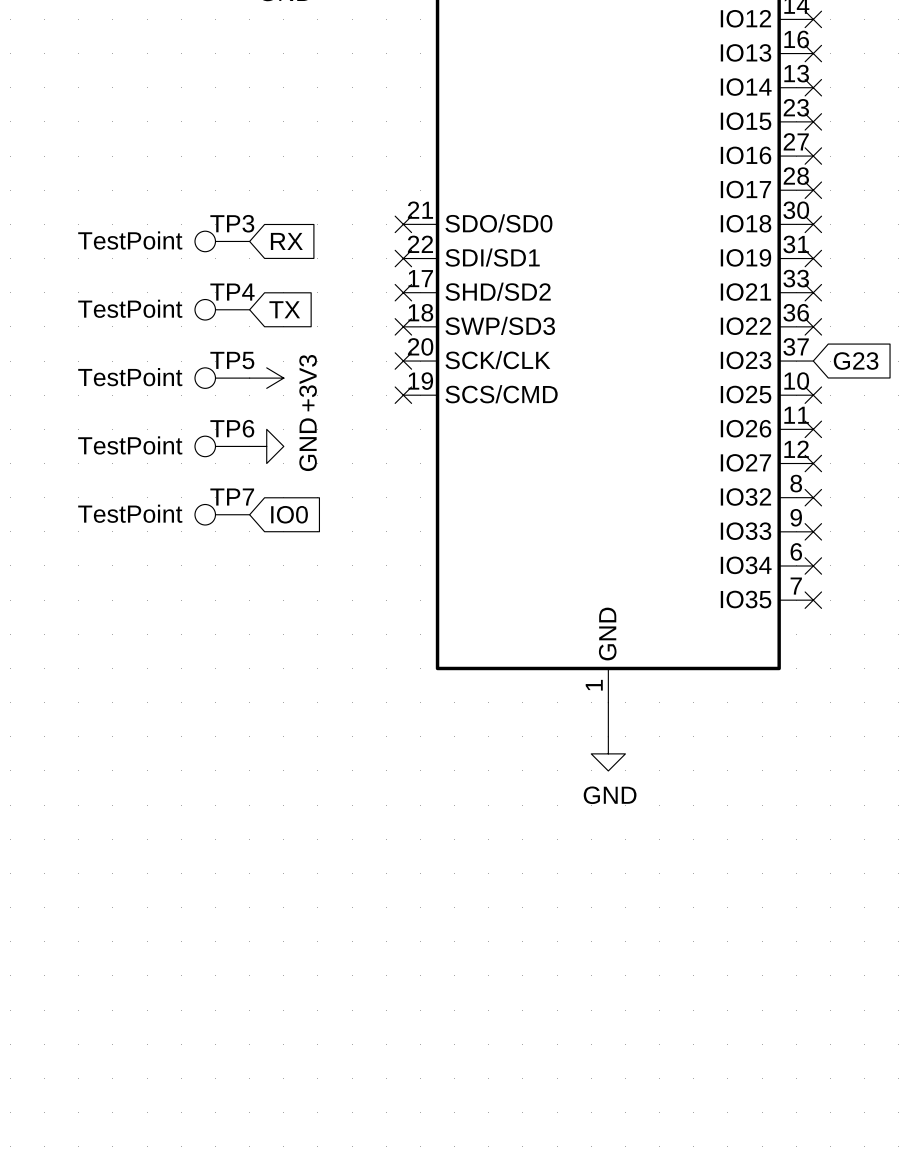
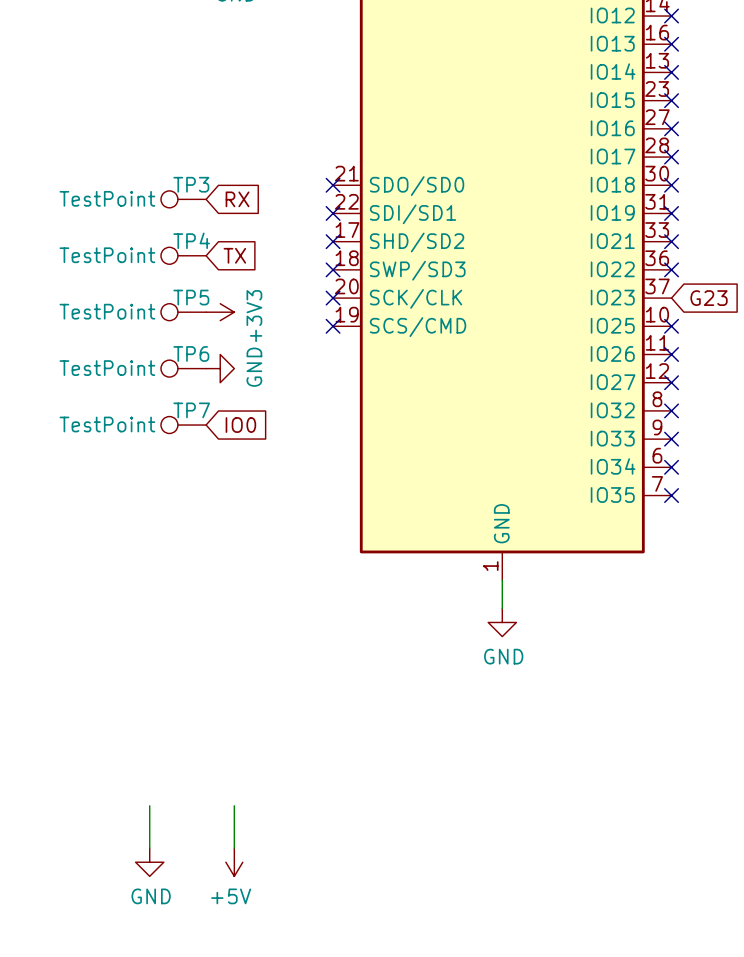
wire: none -> (149, 805) (149, 848)
wire: none -> (234, 805) (234, 848)
power symbol: none -> GND (149, 862)
power symbol: none -> +5V (234, 862)

